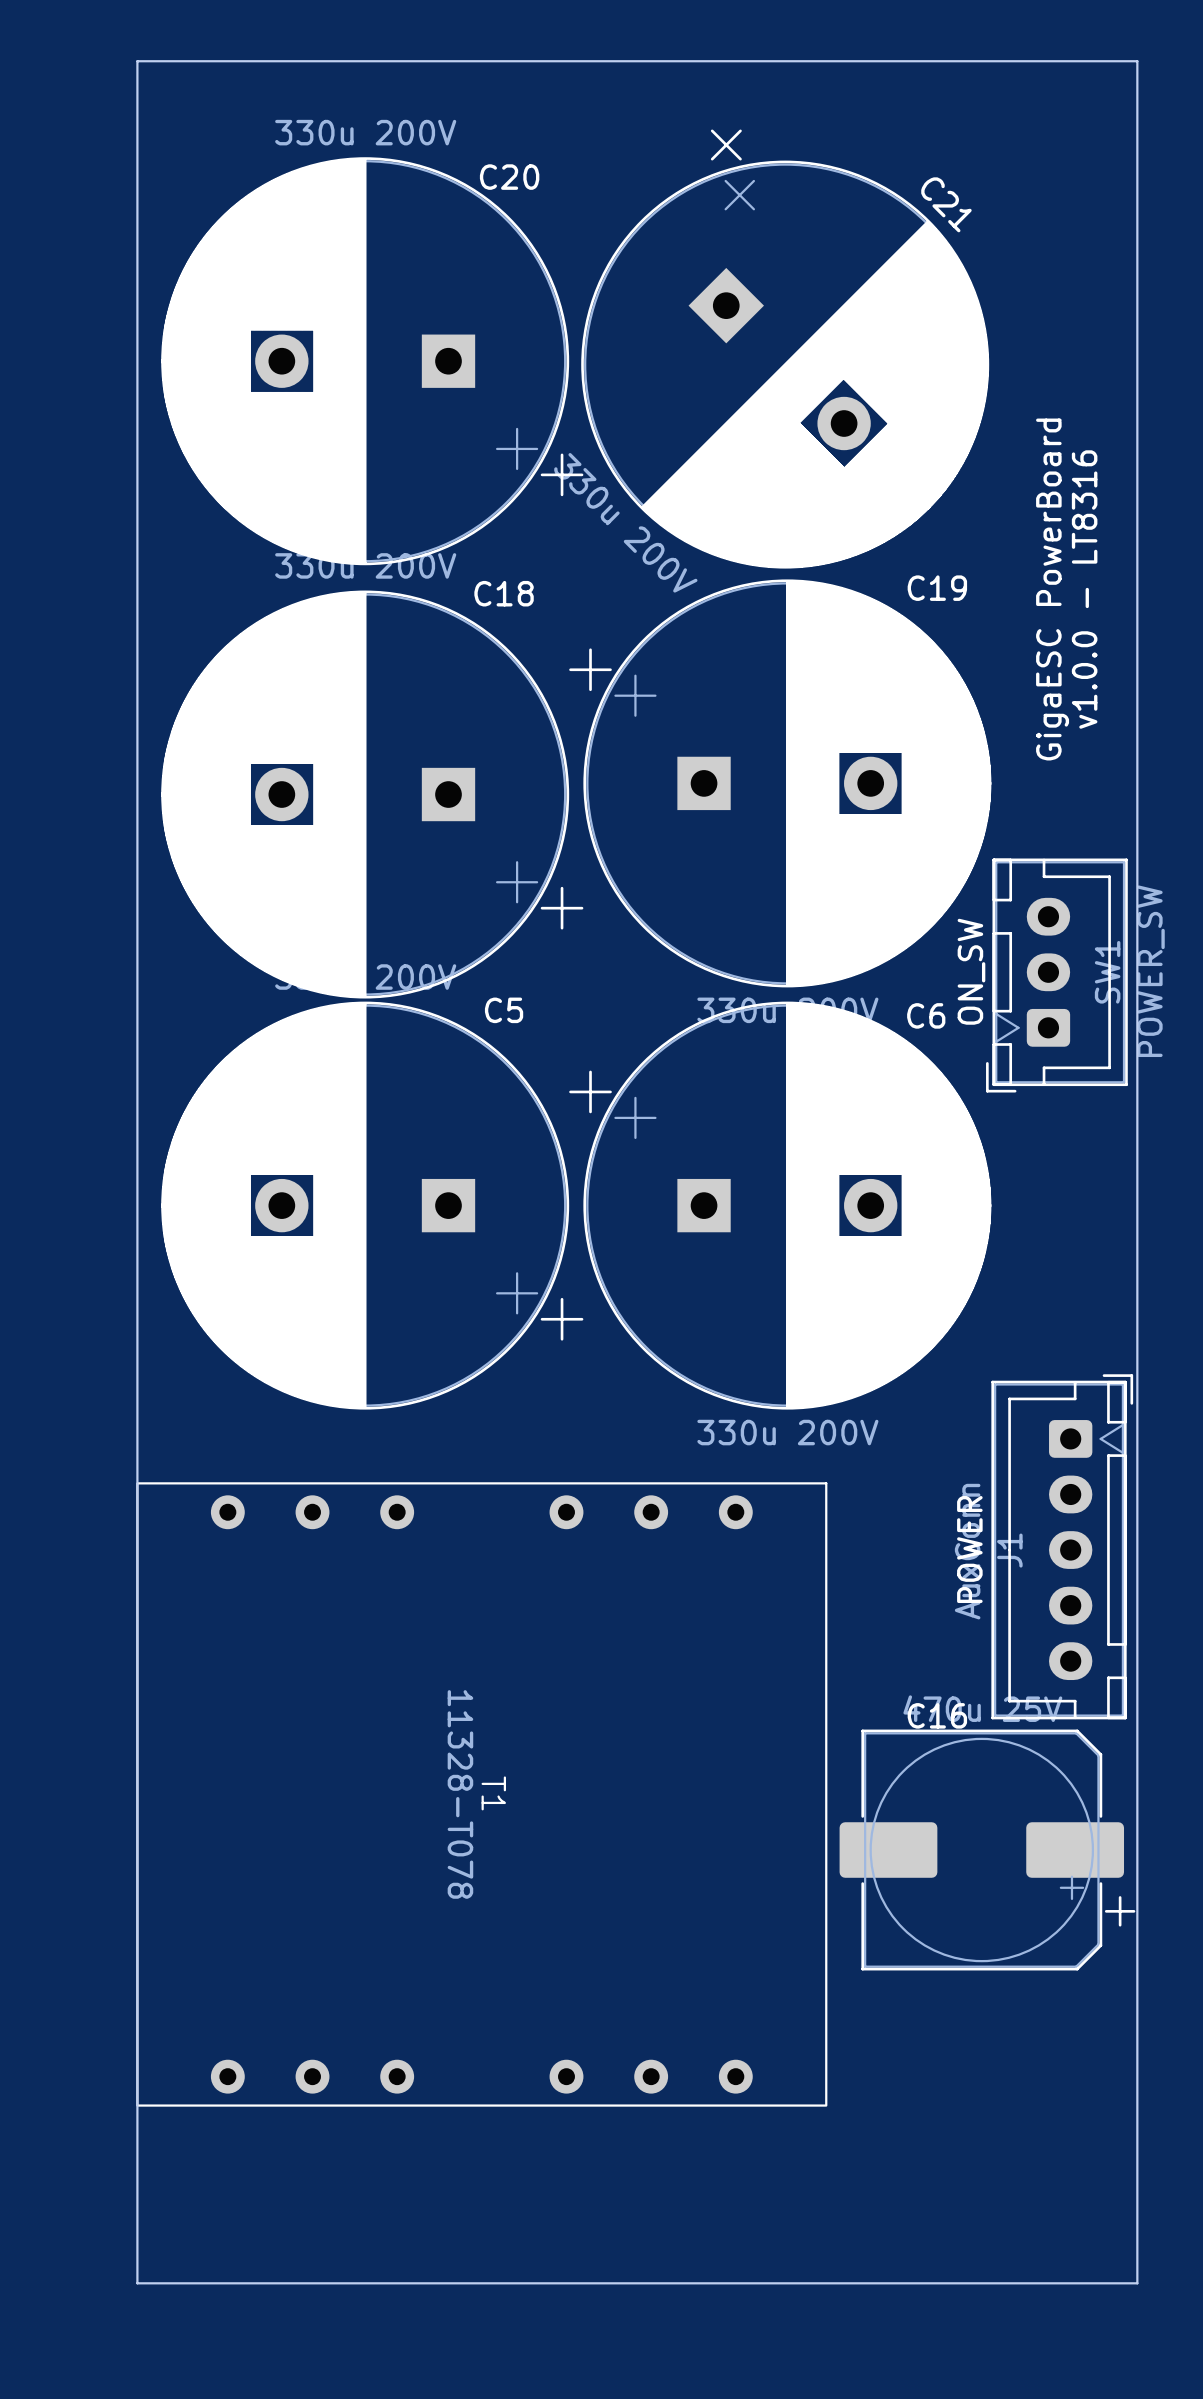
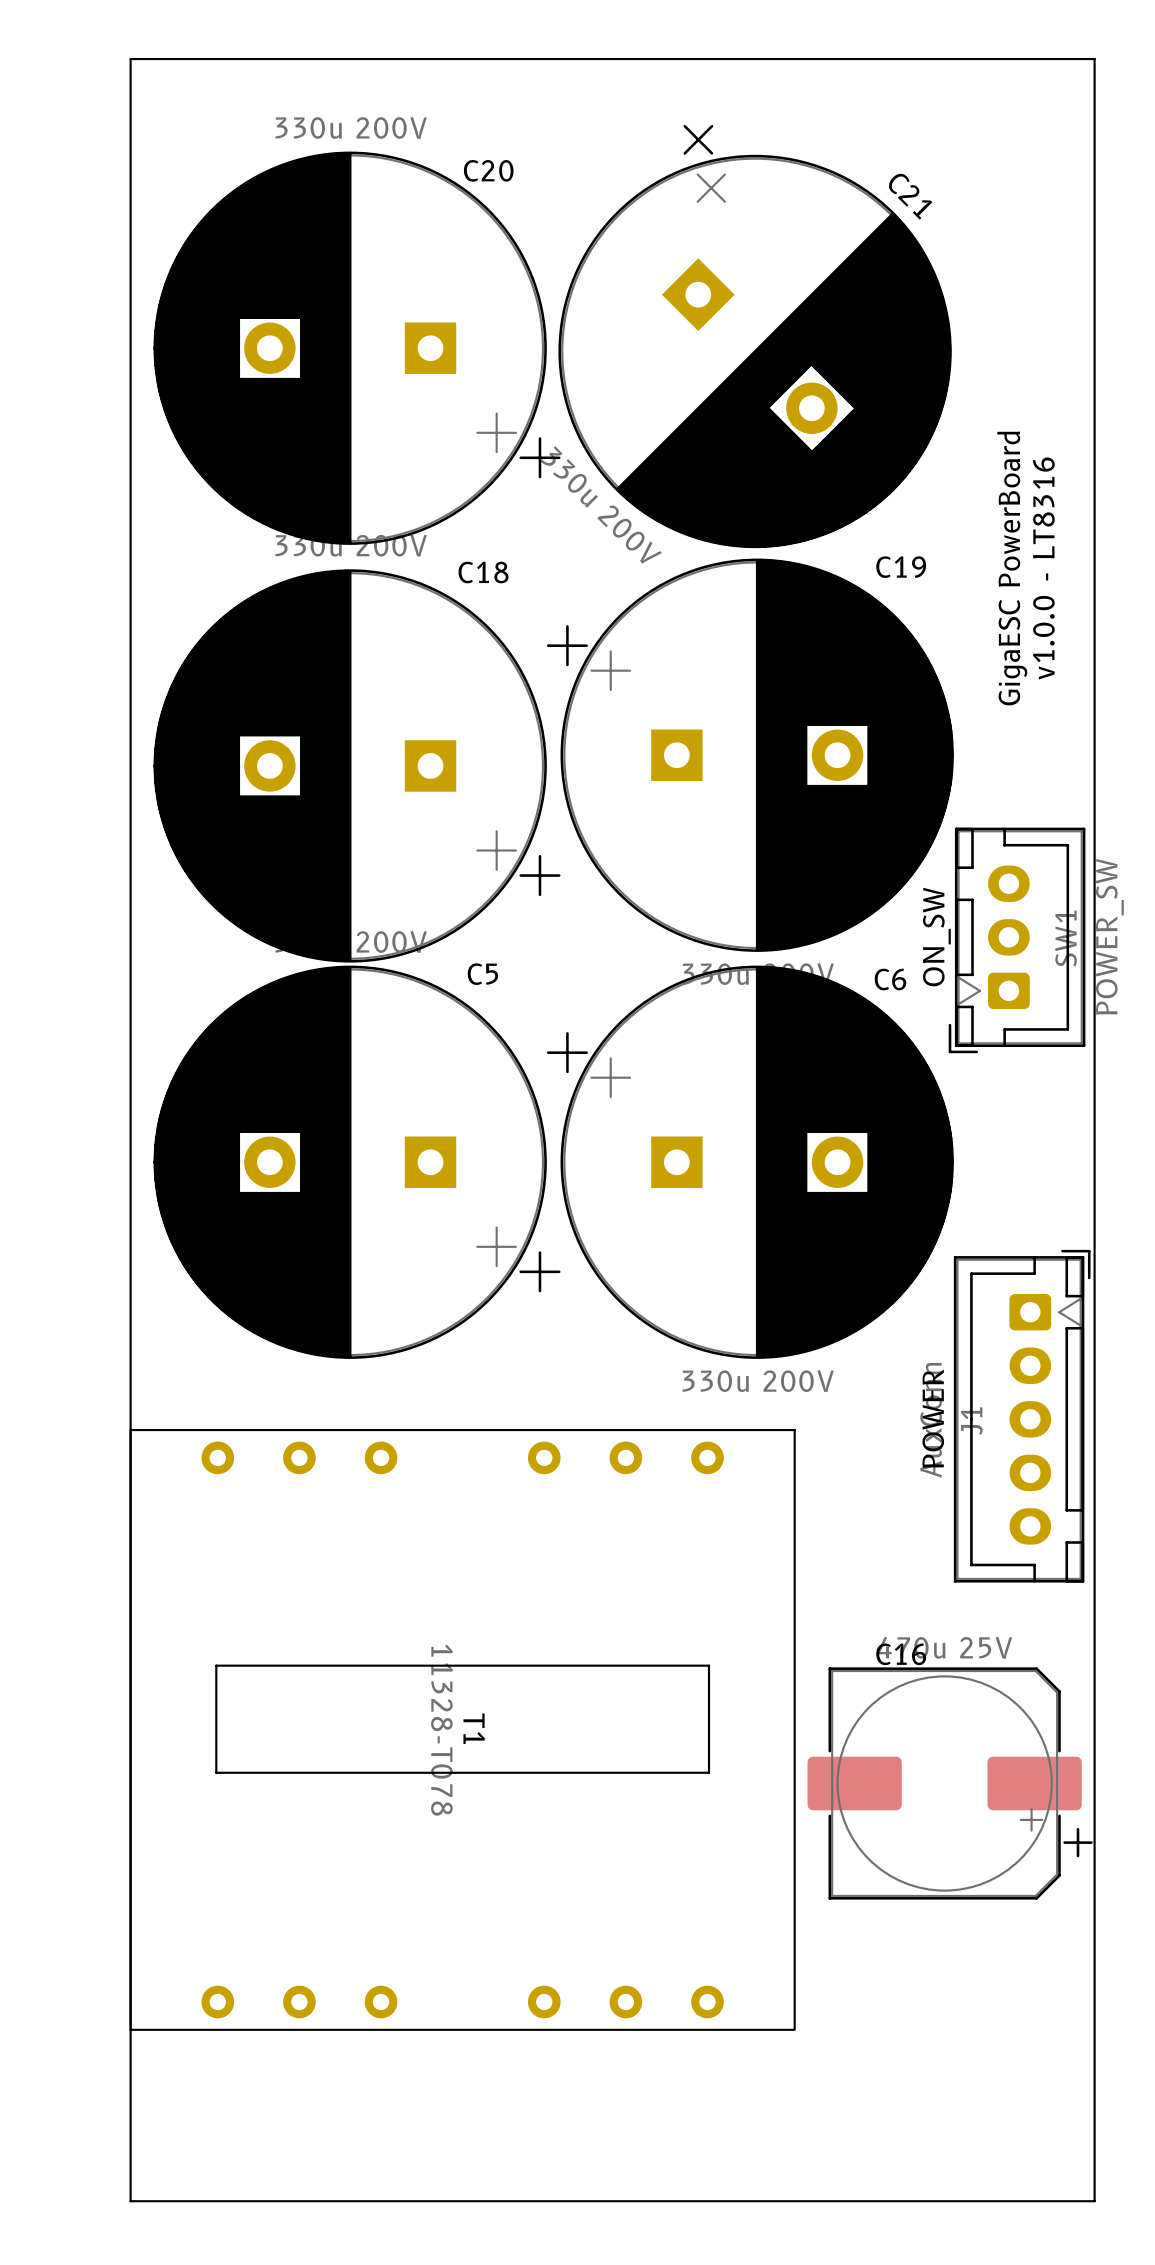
J1 position: (1062, 1546) -> (1022, 1416)
board edge: none -> (216, 1665) (709, 1665) (709, 1772) (216, 1772) (216, 1665)

